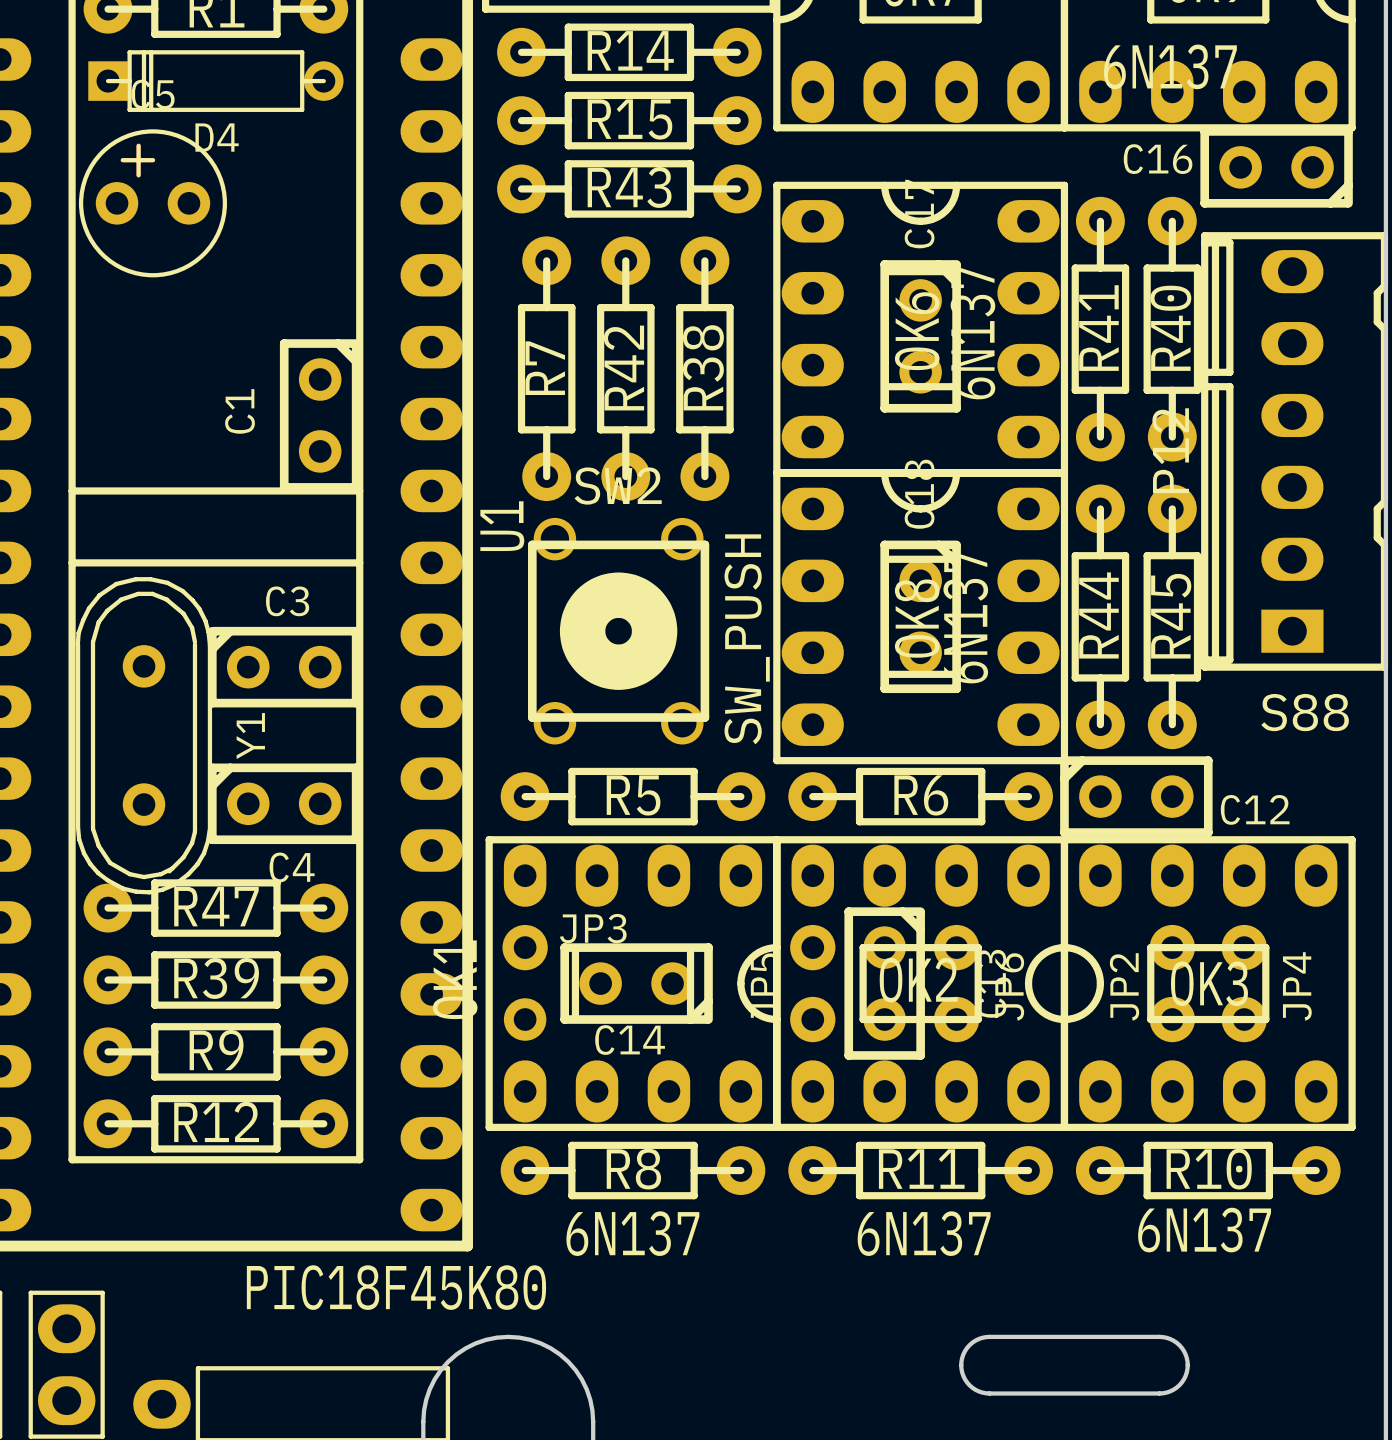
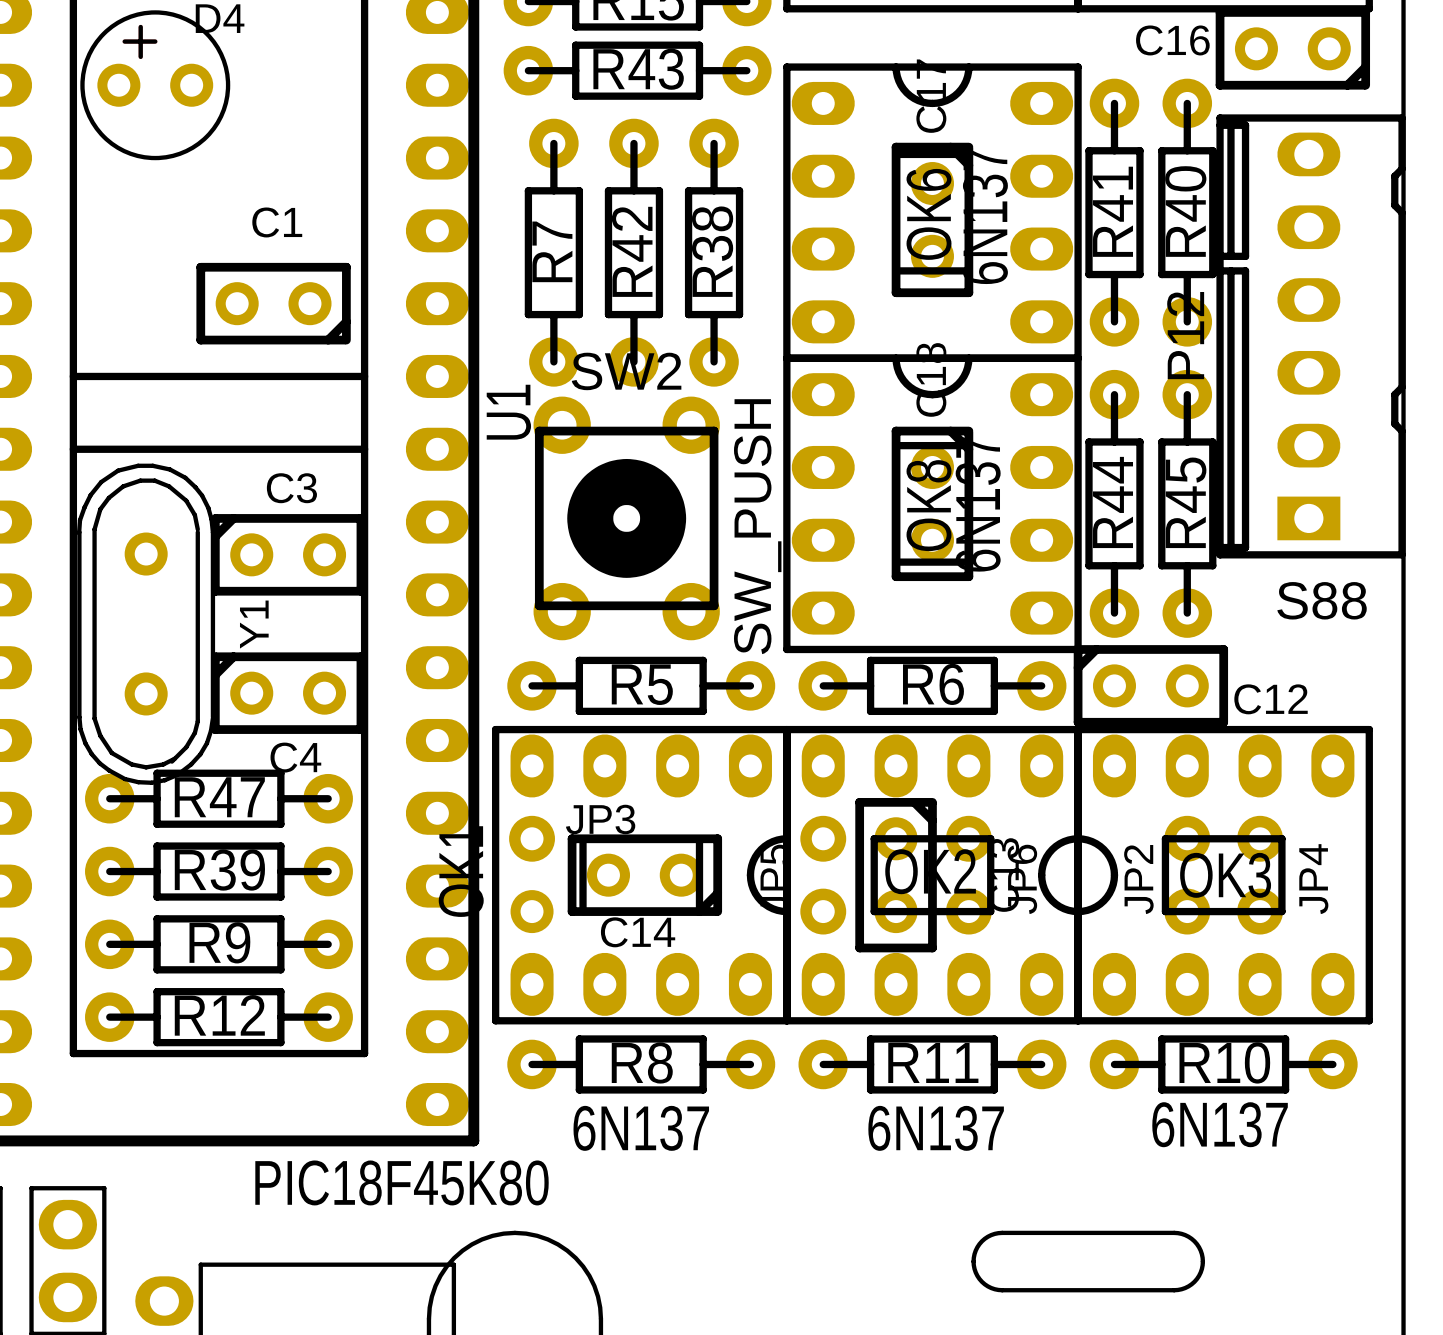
C1 rotation: 0° (320, 415) -> 90° clockwise (273, 303)
SW2 footprint: [528, 517, 710, 745] -> [533, 396, 720, 641]

